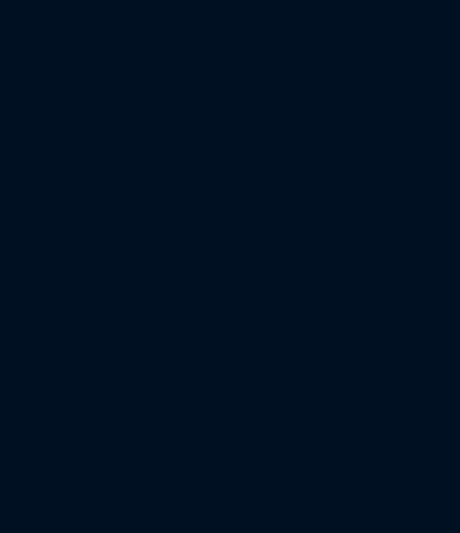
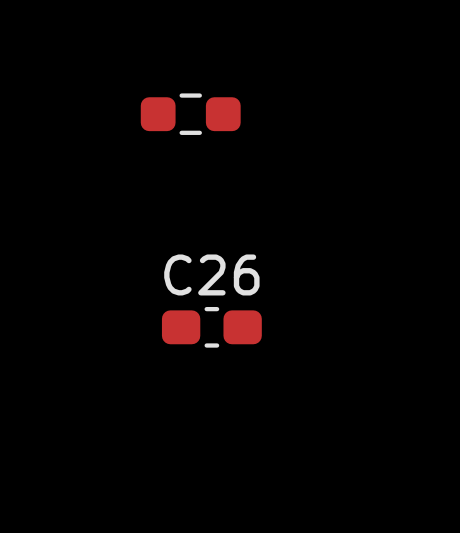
part: none -> (190, 114)
C26: none -> (211, 327)

